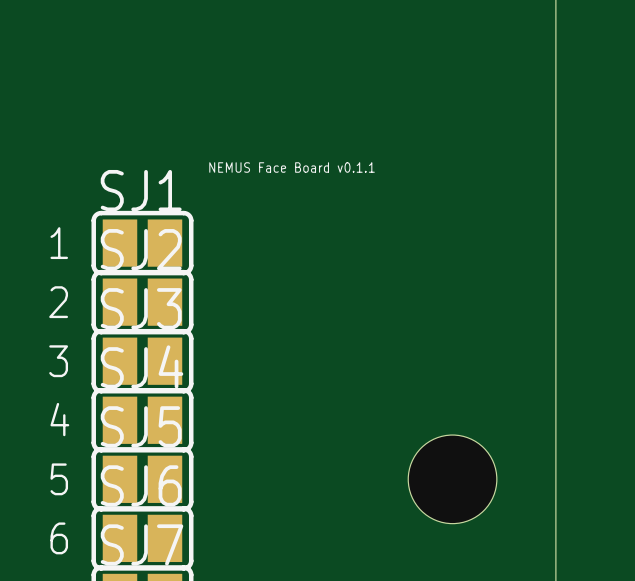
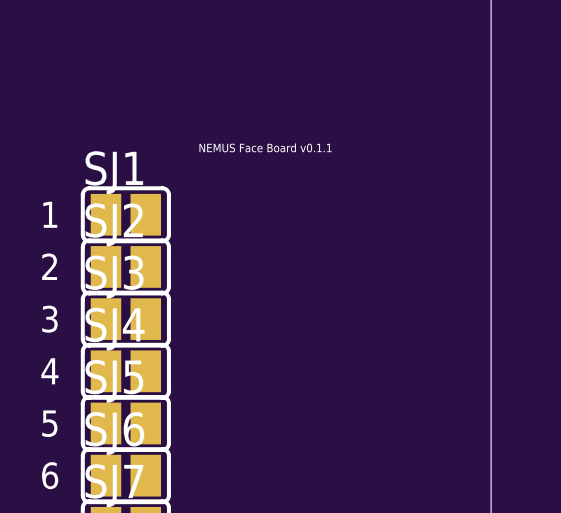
hole: (452, 479) -> none

